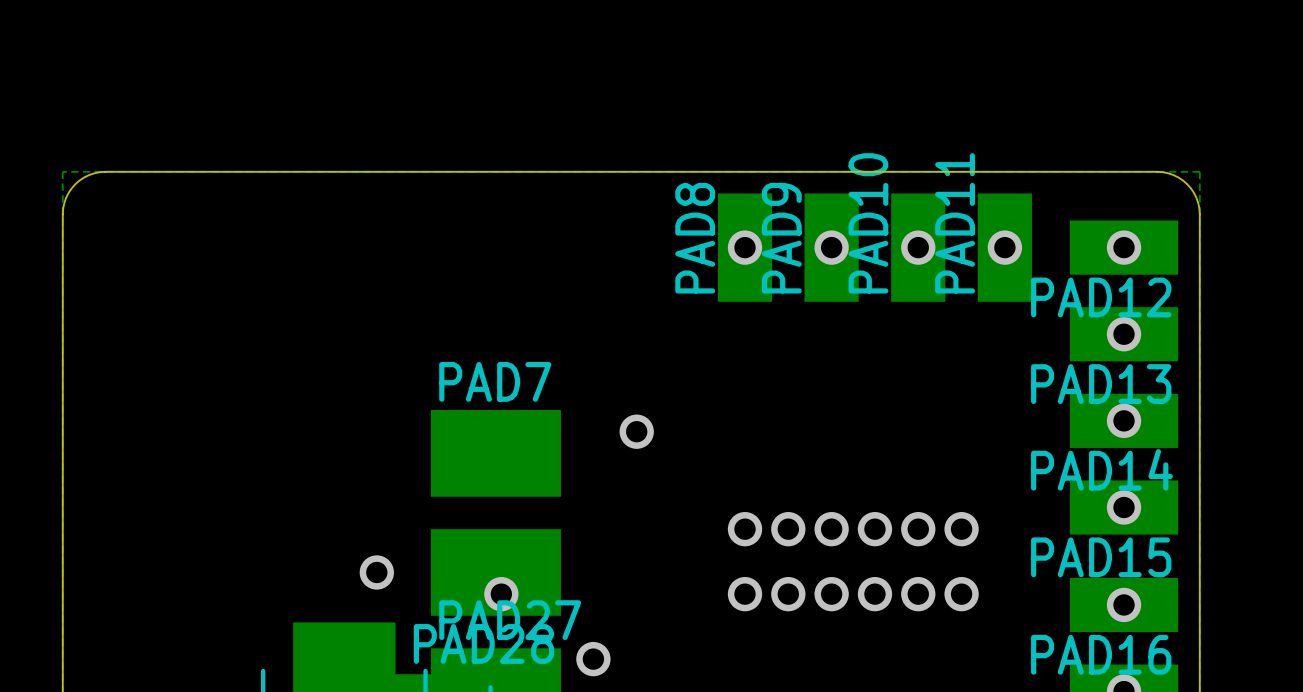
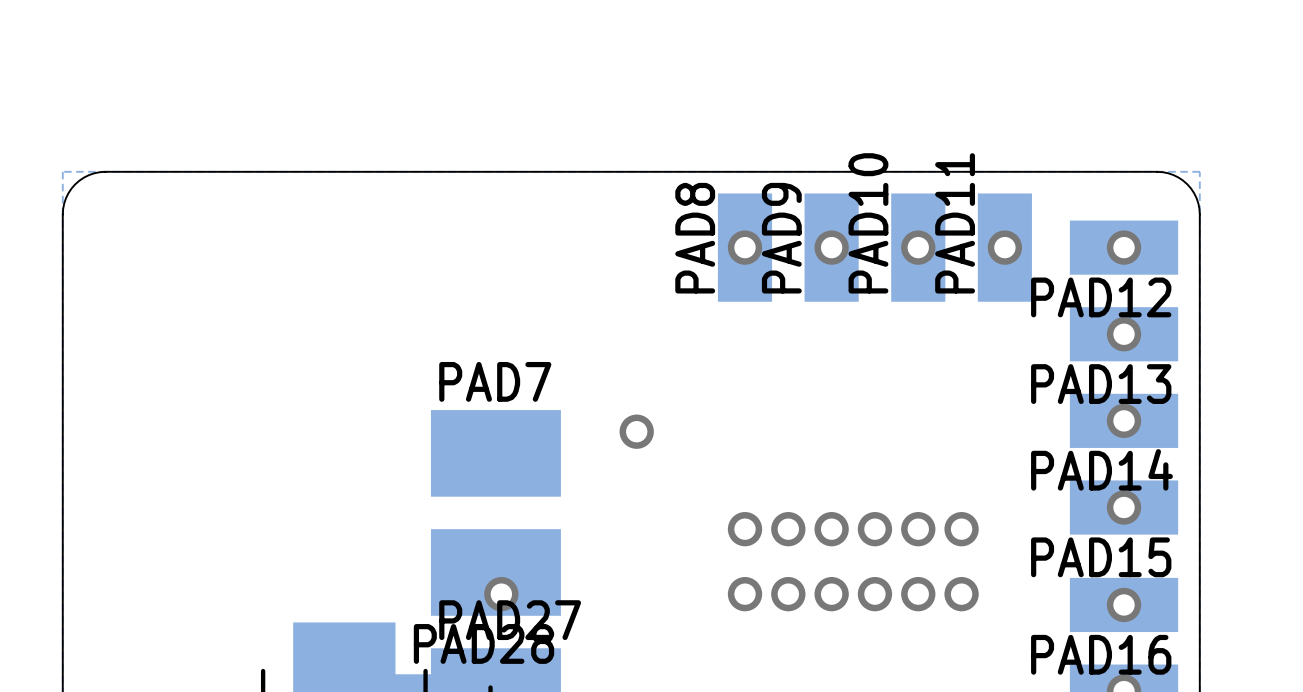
via: (376, 572) -> none
via: (593, 659) -> none

